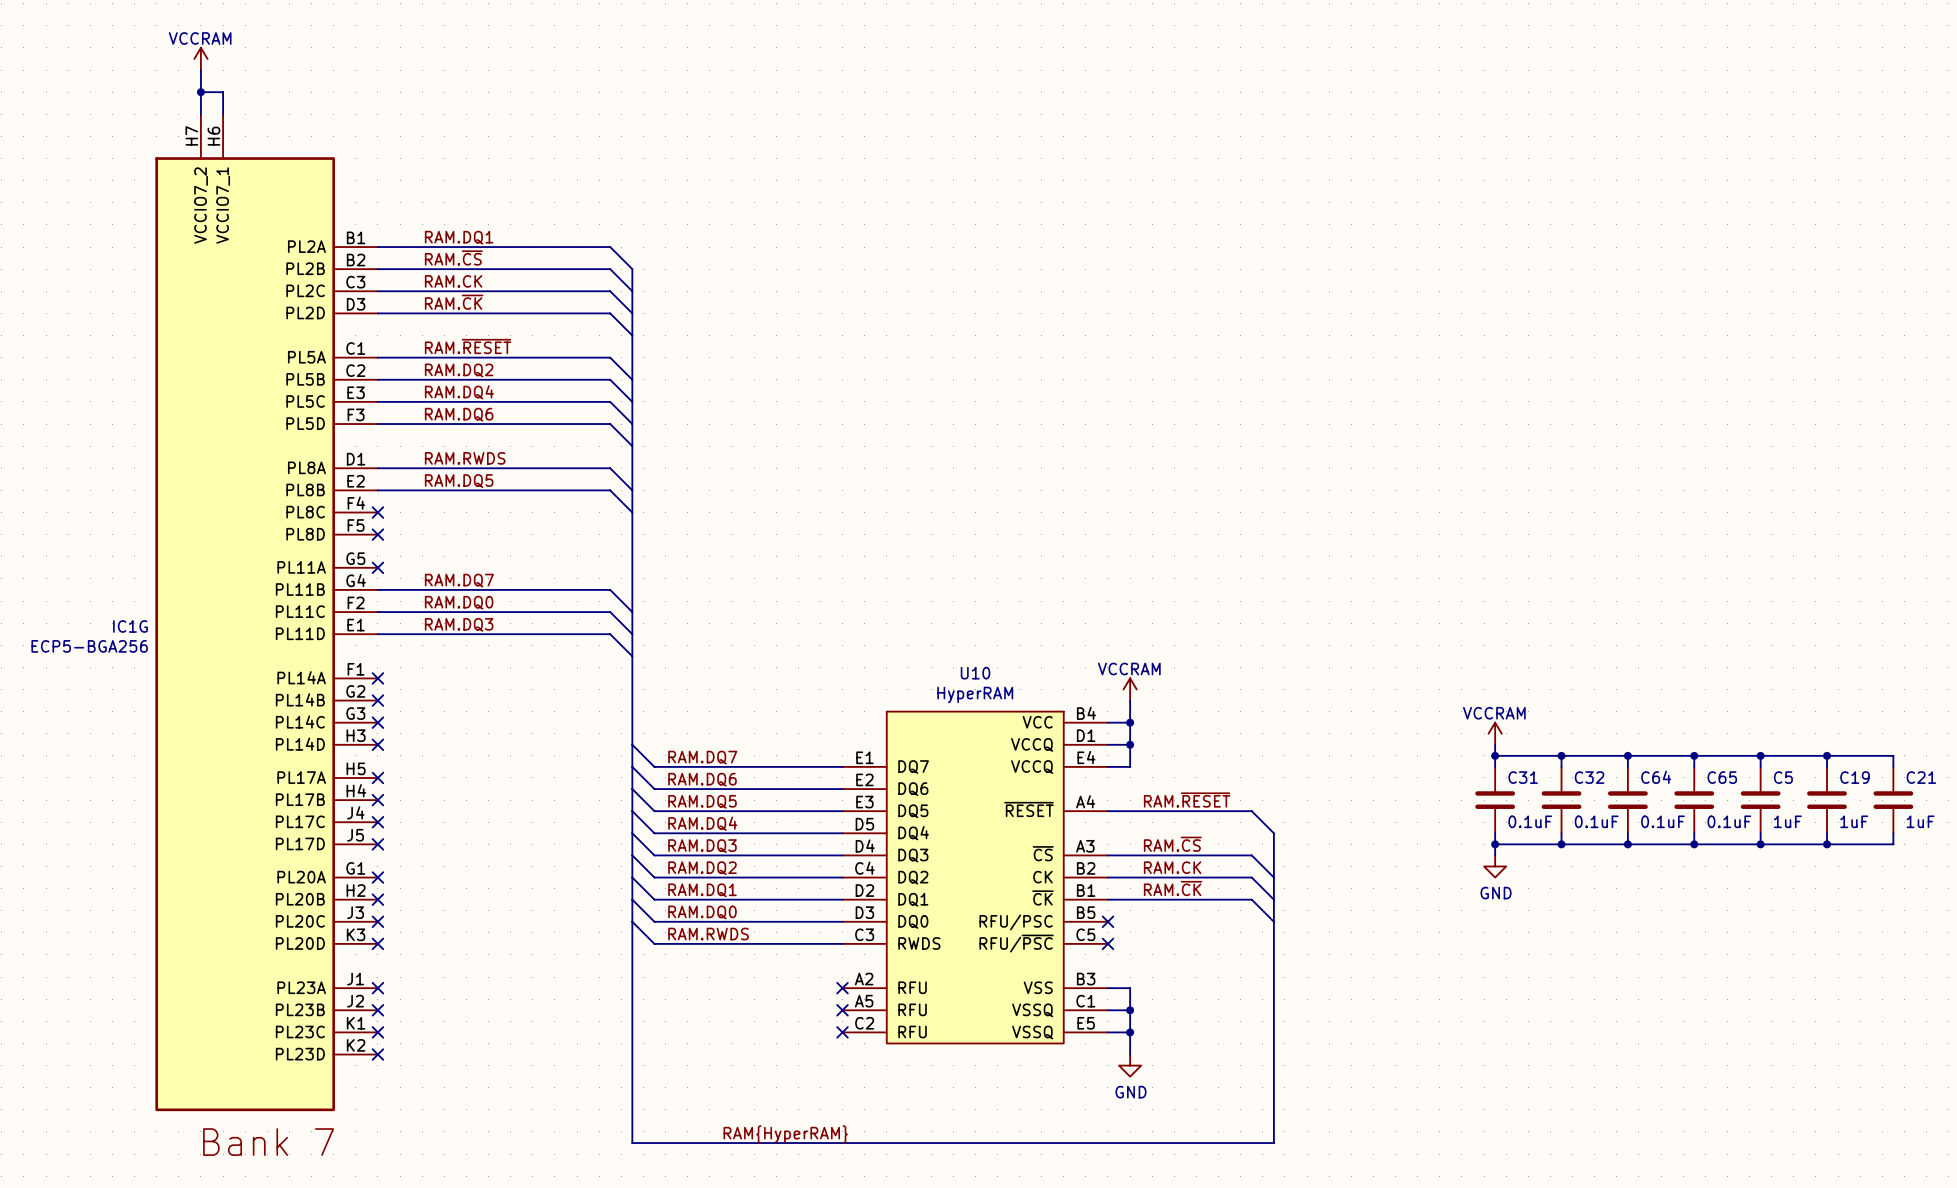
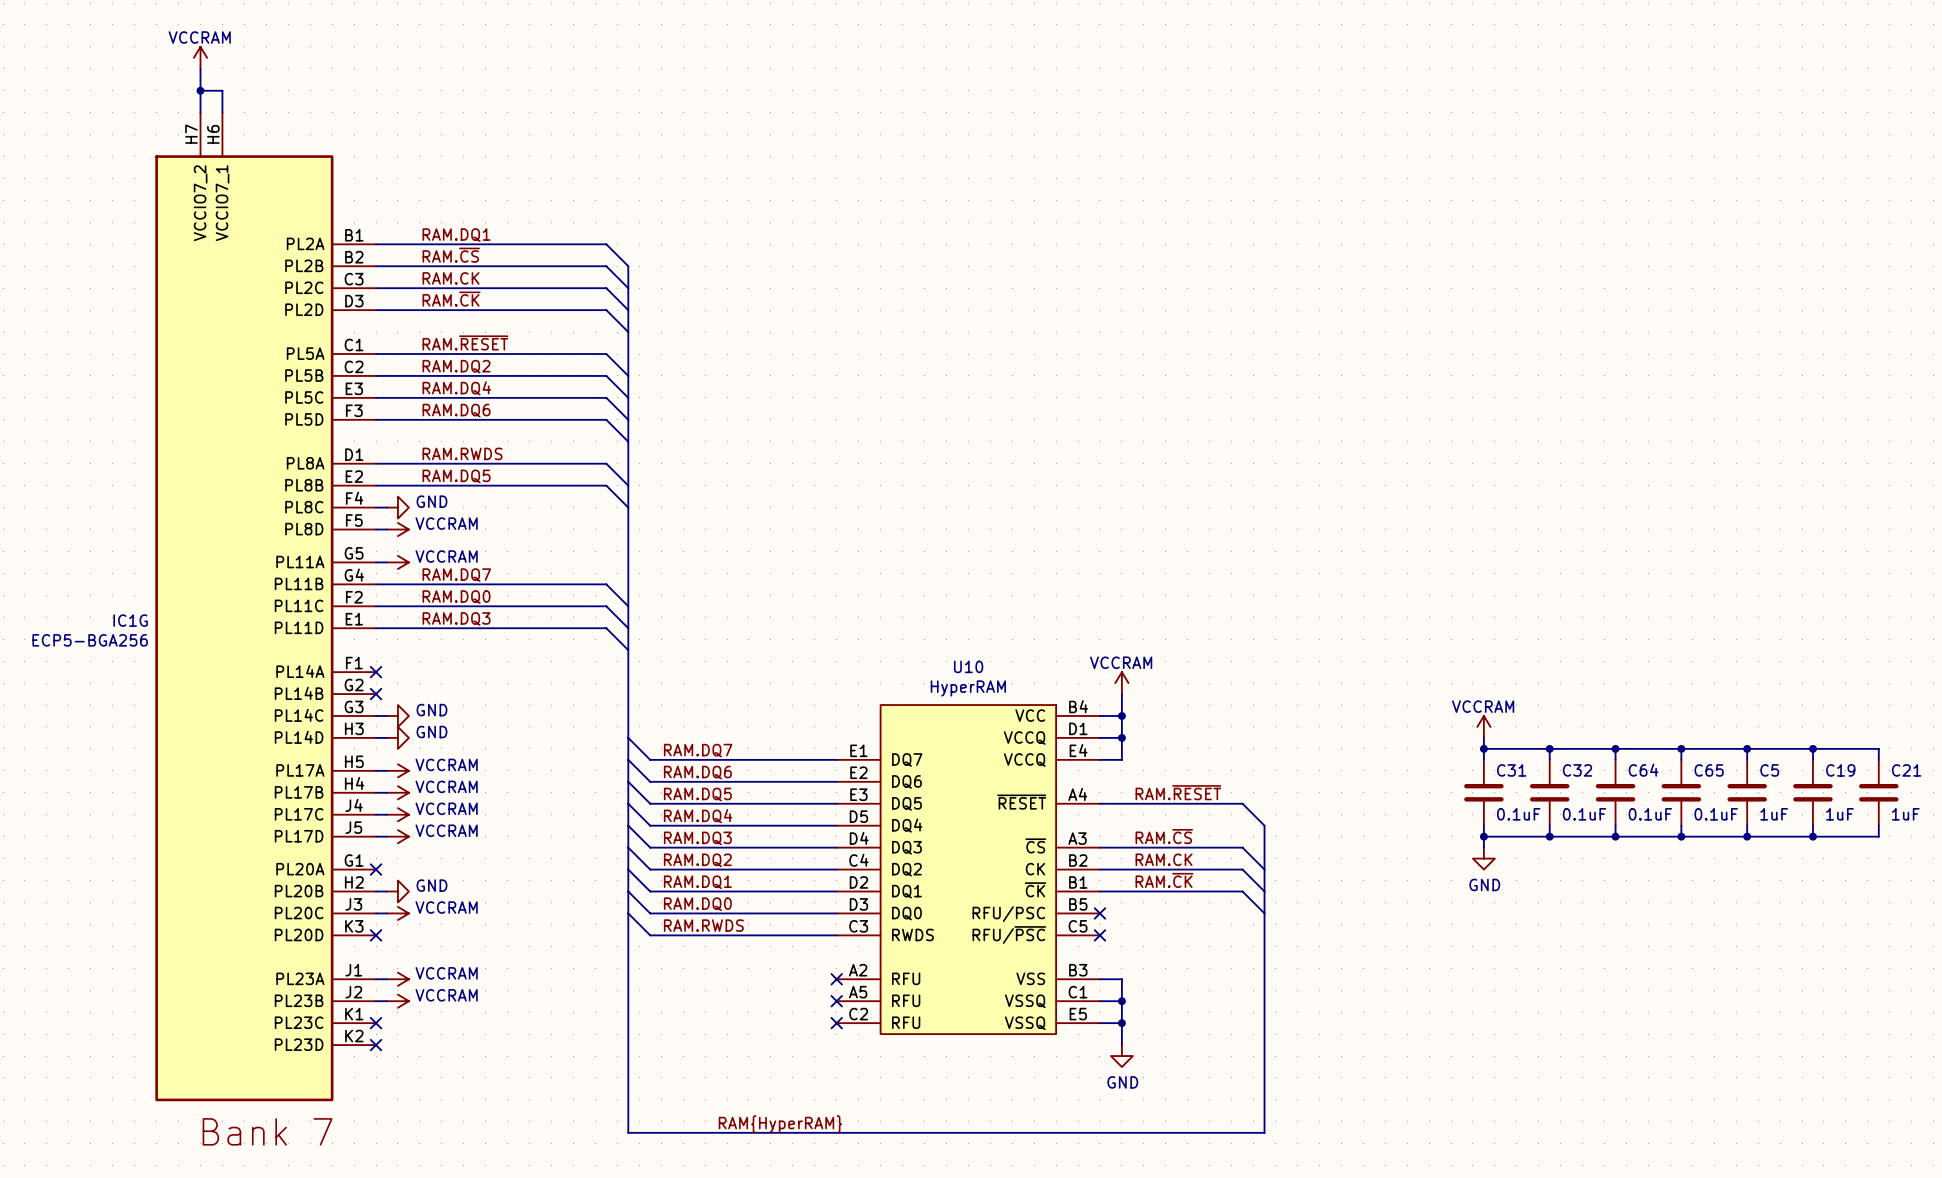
wire: none -> (376, 507) (386, 507)
no-connect mark: (377, 512) -> none
power symbol: none -> GND (397, 507)
wire: none -> (376, 529) (386, 529)
no-connect mark: (377, 534) -> none
power symbol: none -> VCCRAM (397, 529)
wire: none -> (376, 562) (386, 562)
no-connect mark: (377, 567) -> none
power symbol: none -> VCCRAM (397, 562)
wire: none -> (376, 716) (386, 716)
no-connect mark: (377, 722) -> none
power symbol: none -> GND (397, 716)
wire: none -> (376, 737) (386, 737)
no-connect mark: (377, 744) -> none
power symbol: none -> GND (397, 737)
wire: none -> (376, 770) (386, 770)
no-connect mark: (377, 777) -> none
power symbol: none -> VCCRAM (397, 770)
wire: none -> (376, 792) (386, 792)
no-connect mark: (377, 800) -> none
power symbol: none -> VCCRAM (397, 792)
wire: none -> (376, 814) (386, 814)
no-connect mark: (377, 822) -> none
power symbol: none -> VCCRAM (397, 814)
wire: none -> (376, 836) (386, 836)
no-connect mark: (377, 844) -> none
power symbol: none -> VCCRAM (397, 836)
wire: none -> (376, 891) (386, 891)
no-connect mark: (377, 899) -> none
power symbol: none -> GND (397, 891)
wire: none -> (376, 913) (386, 913)
no-connect mark: (377, 921) -> none
power symbol: none -> VCCRAM (397, 913)
wire: none -> (376, 979) (386, 979)
no-connect mark: (377, 988) -> none
power symbol: none -> VCCRAM (397, 979)
wire: none -> (376, 1001) (386, 1001)
no-connect mark: (377, 1010) -> none
power symbol: none -> VCCRAM (397, 1001)

